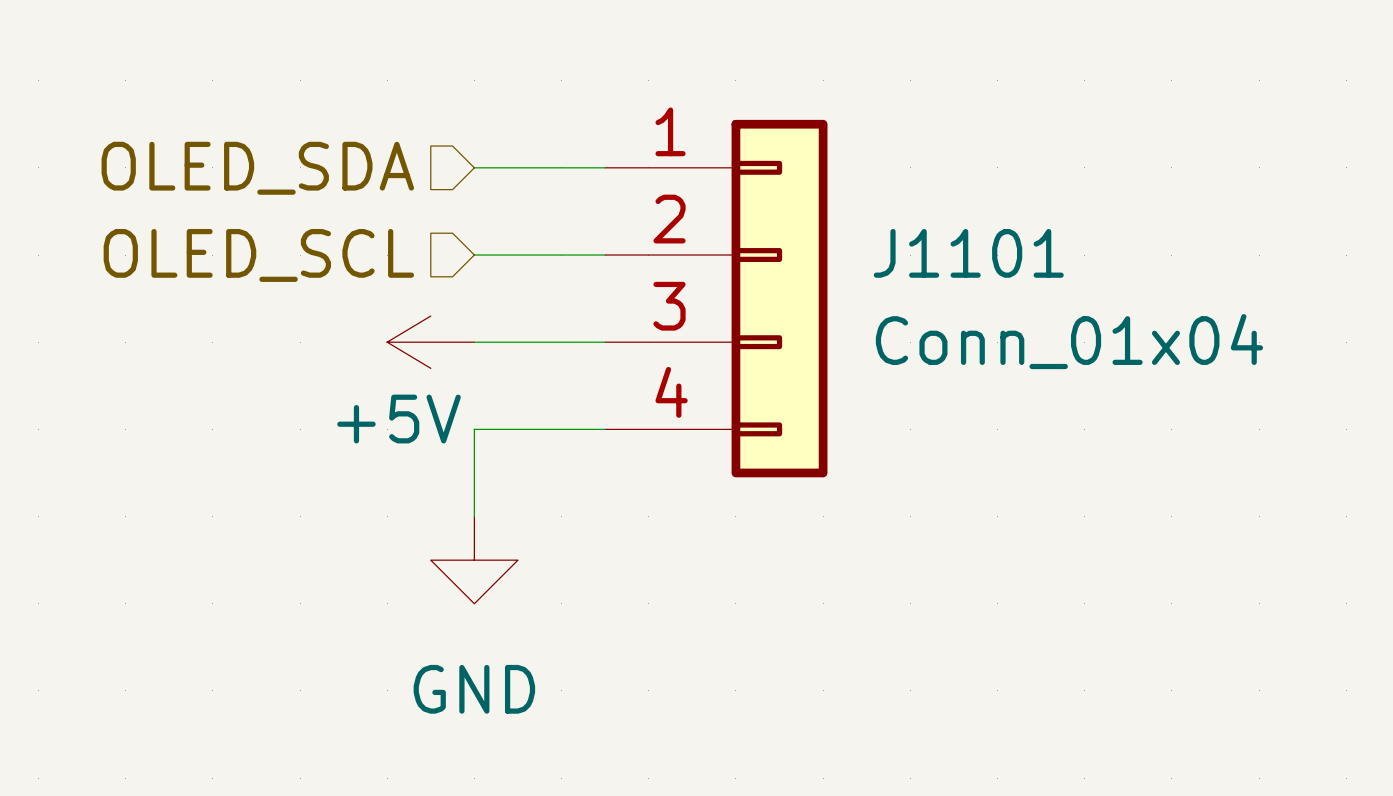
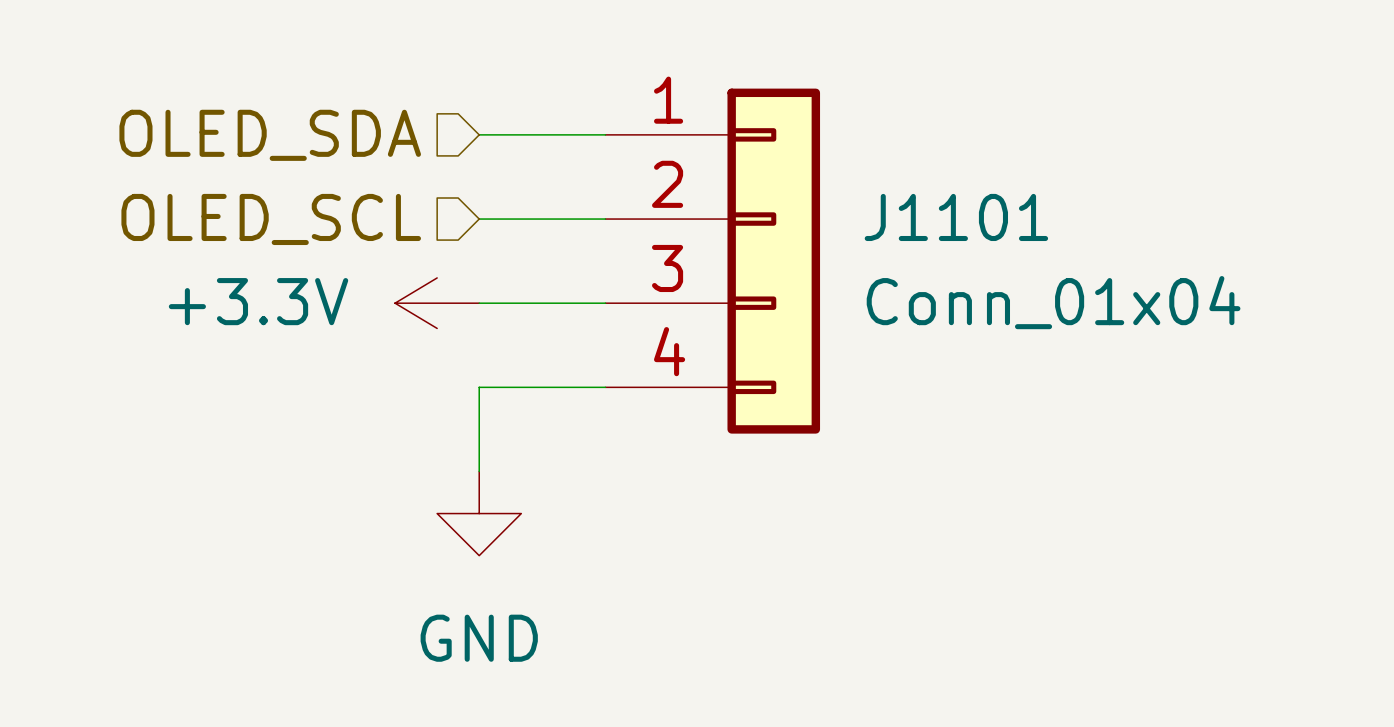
power symbol: +5V (430, 342) -> +3.3V (437, 303)

